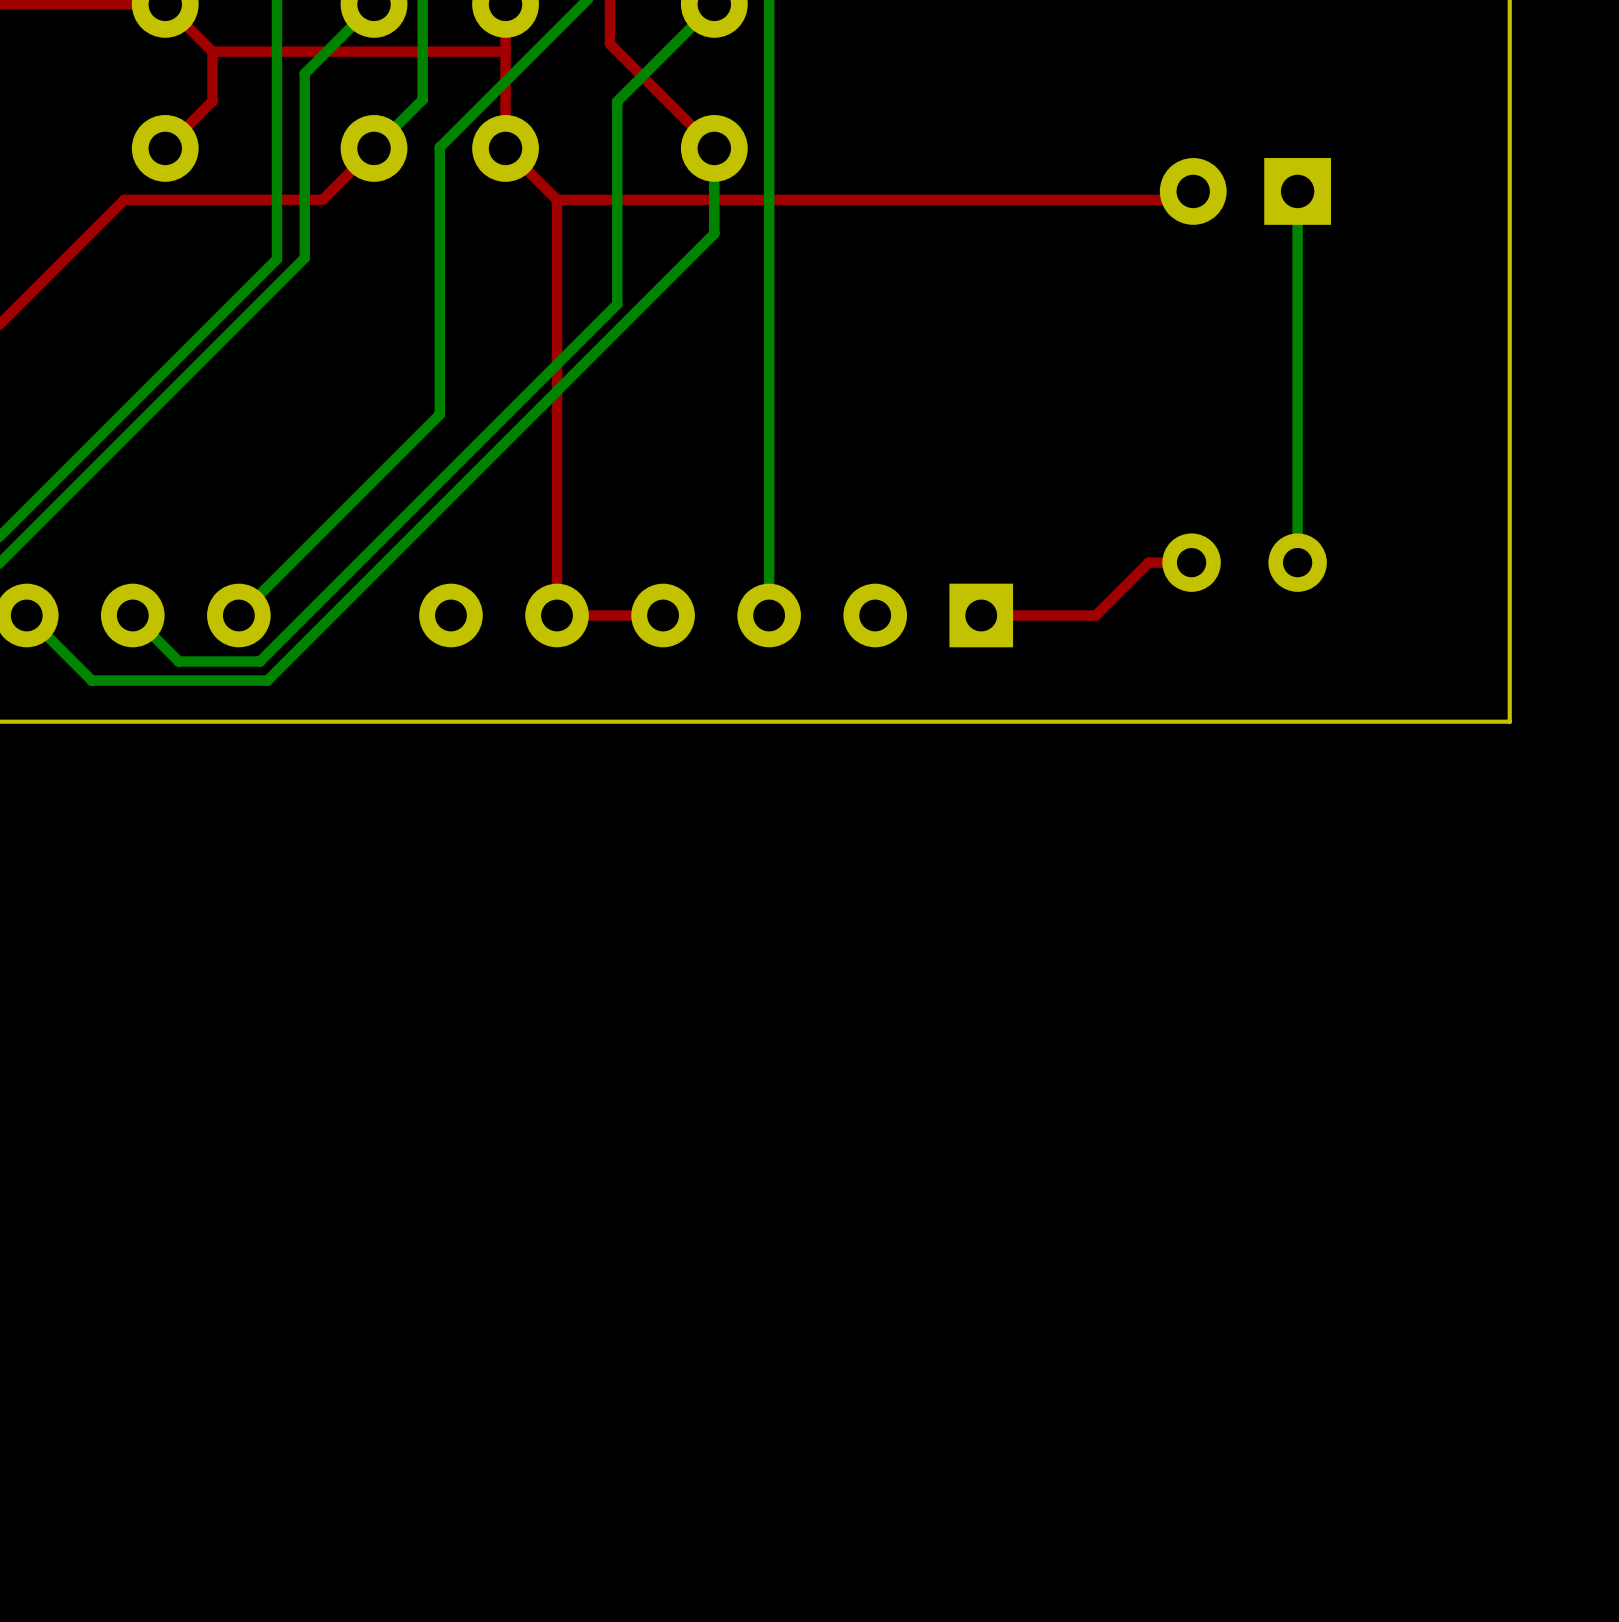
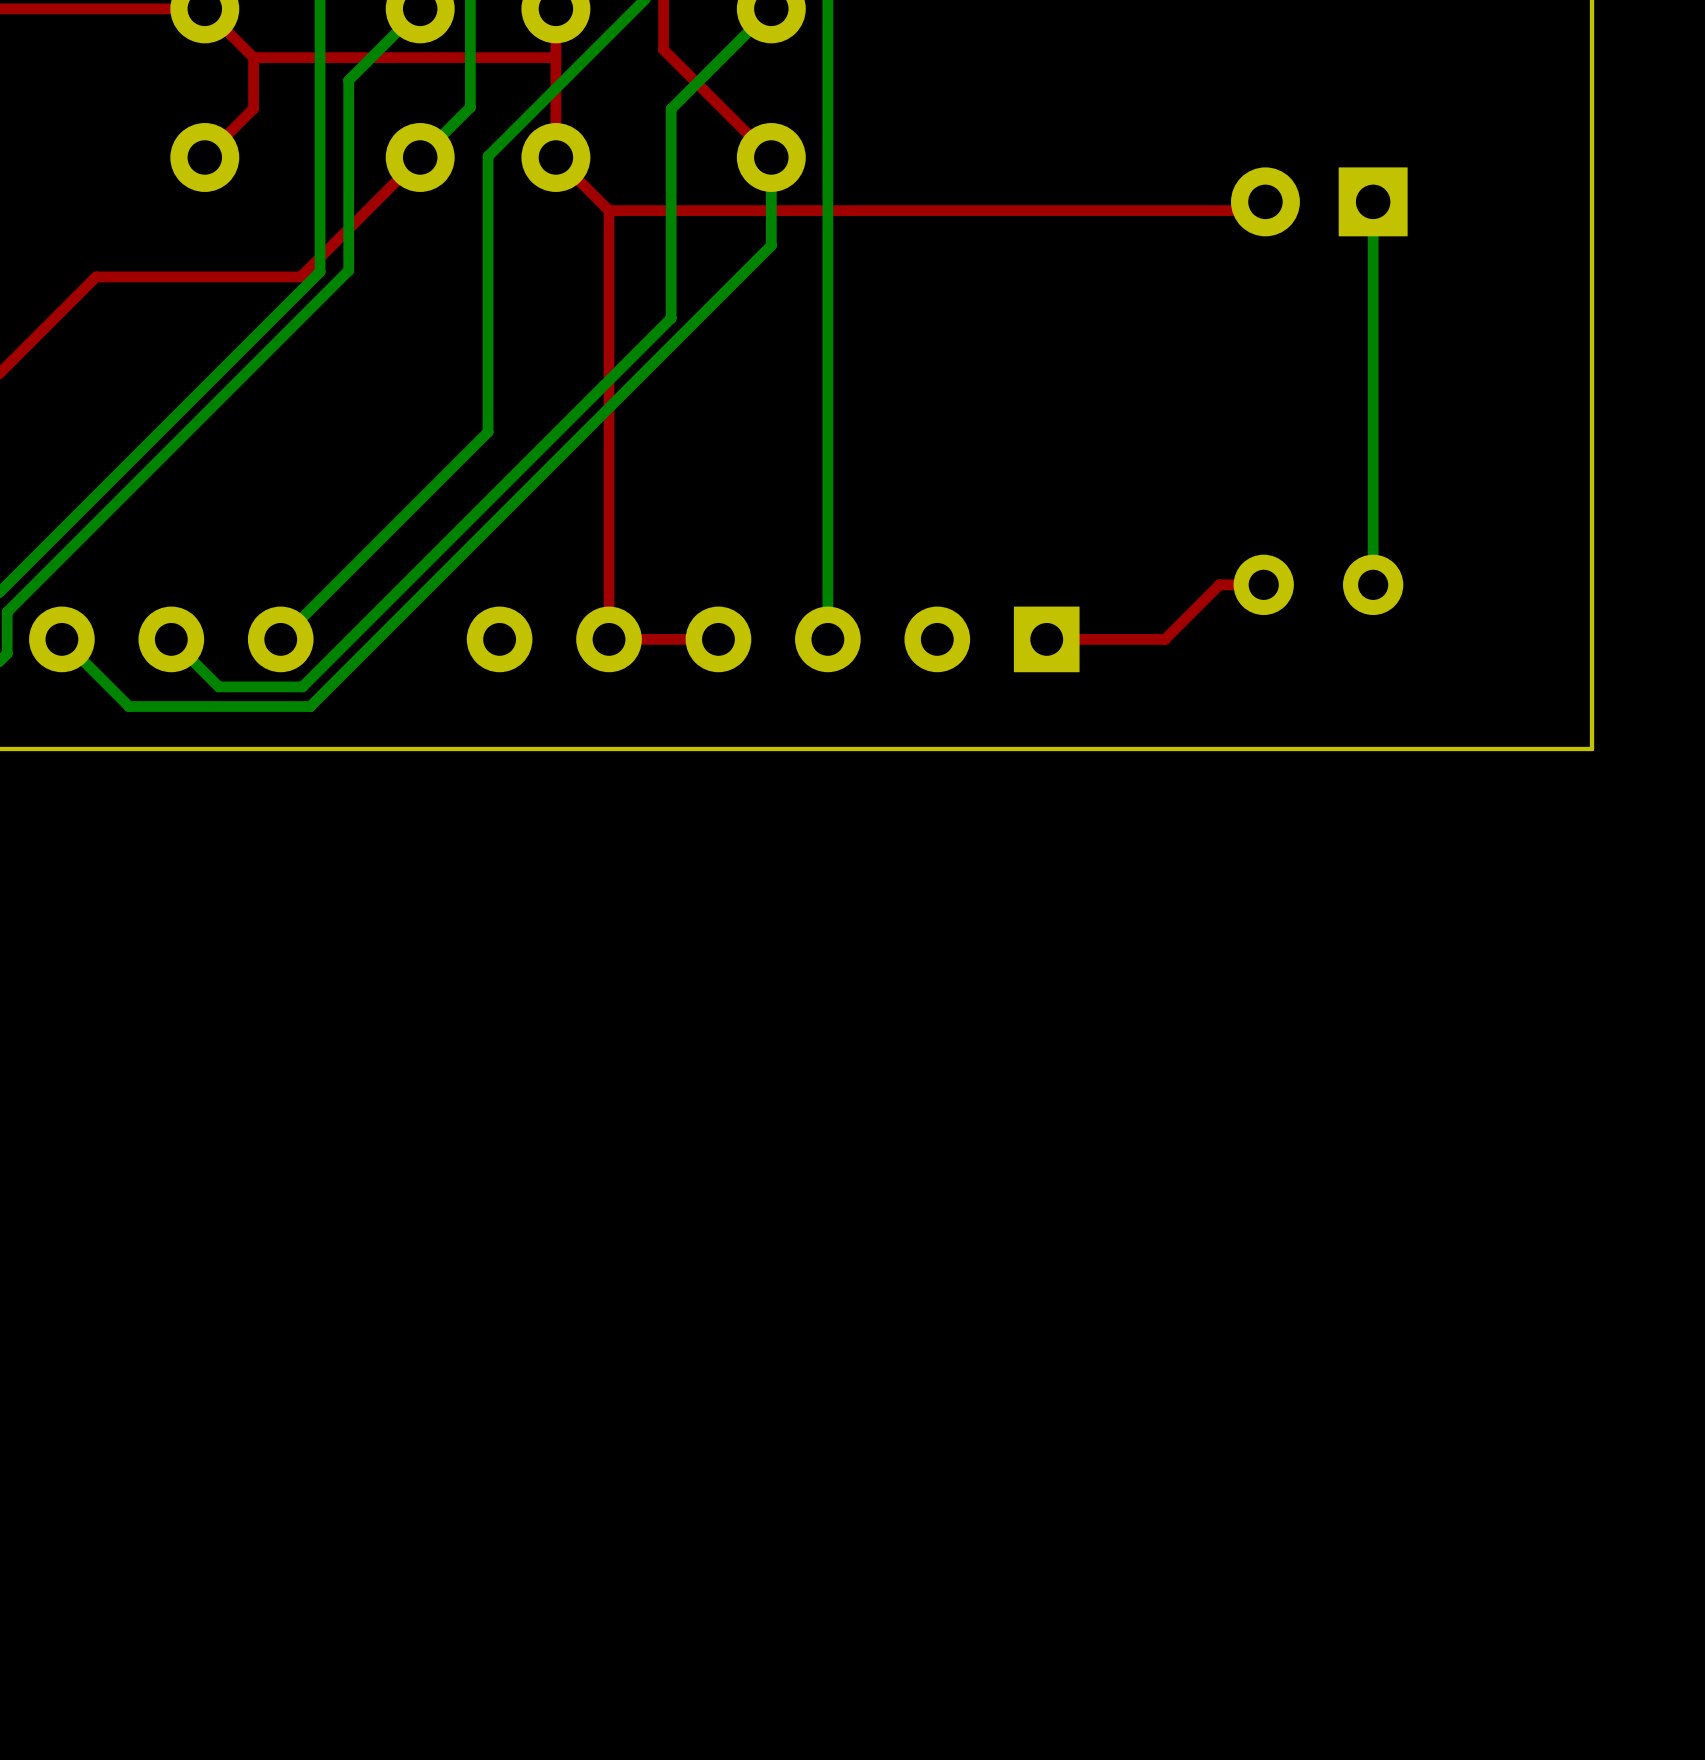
top track: (322, 199) (124, 199) (59, 264) -> (367, 210) (300, 276) (96, 276)

